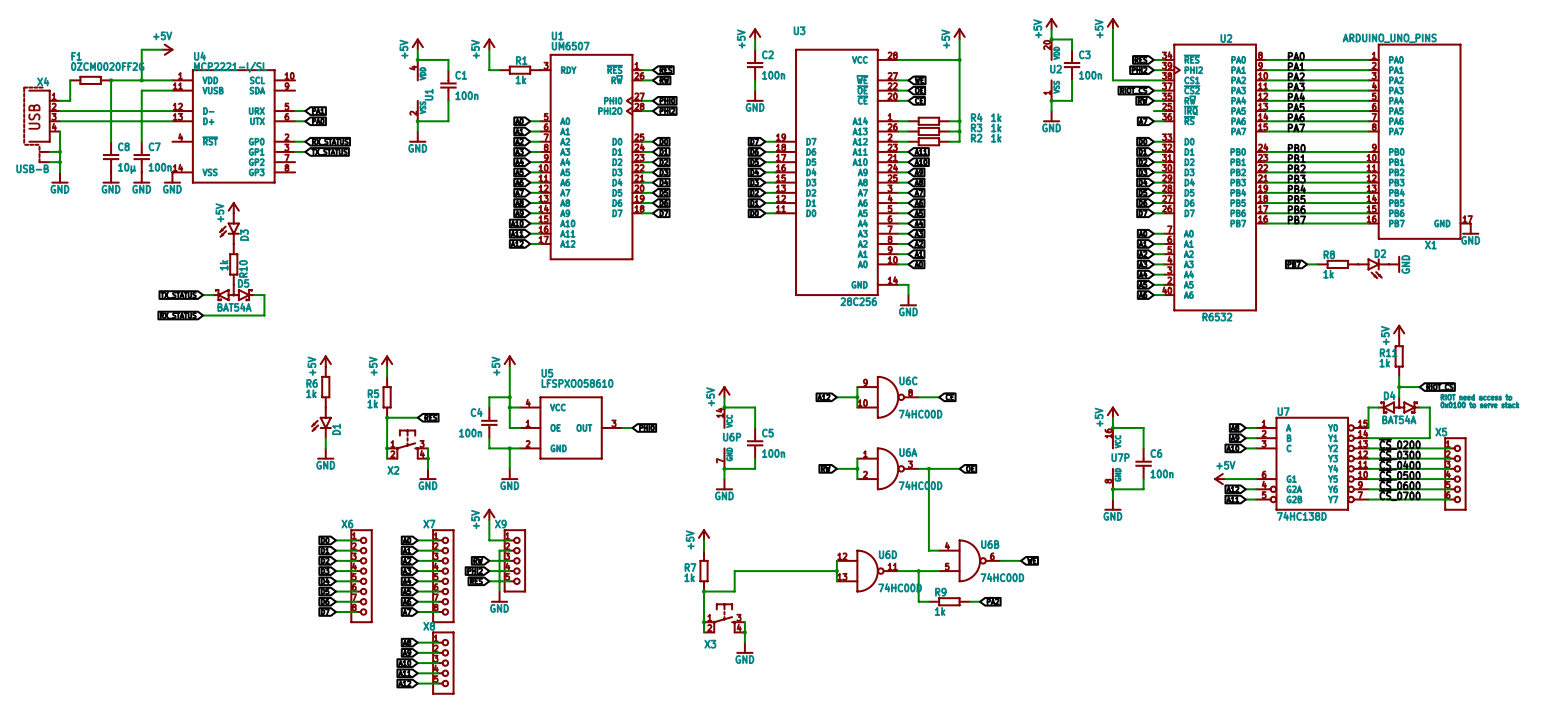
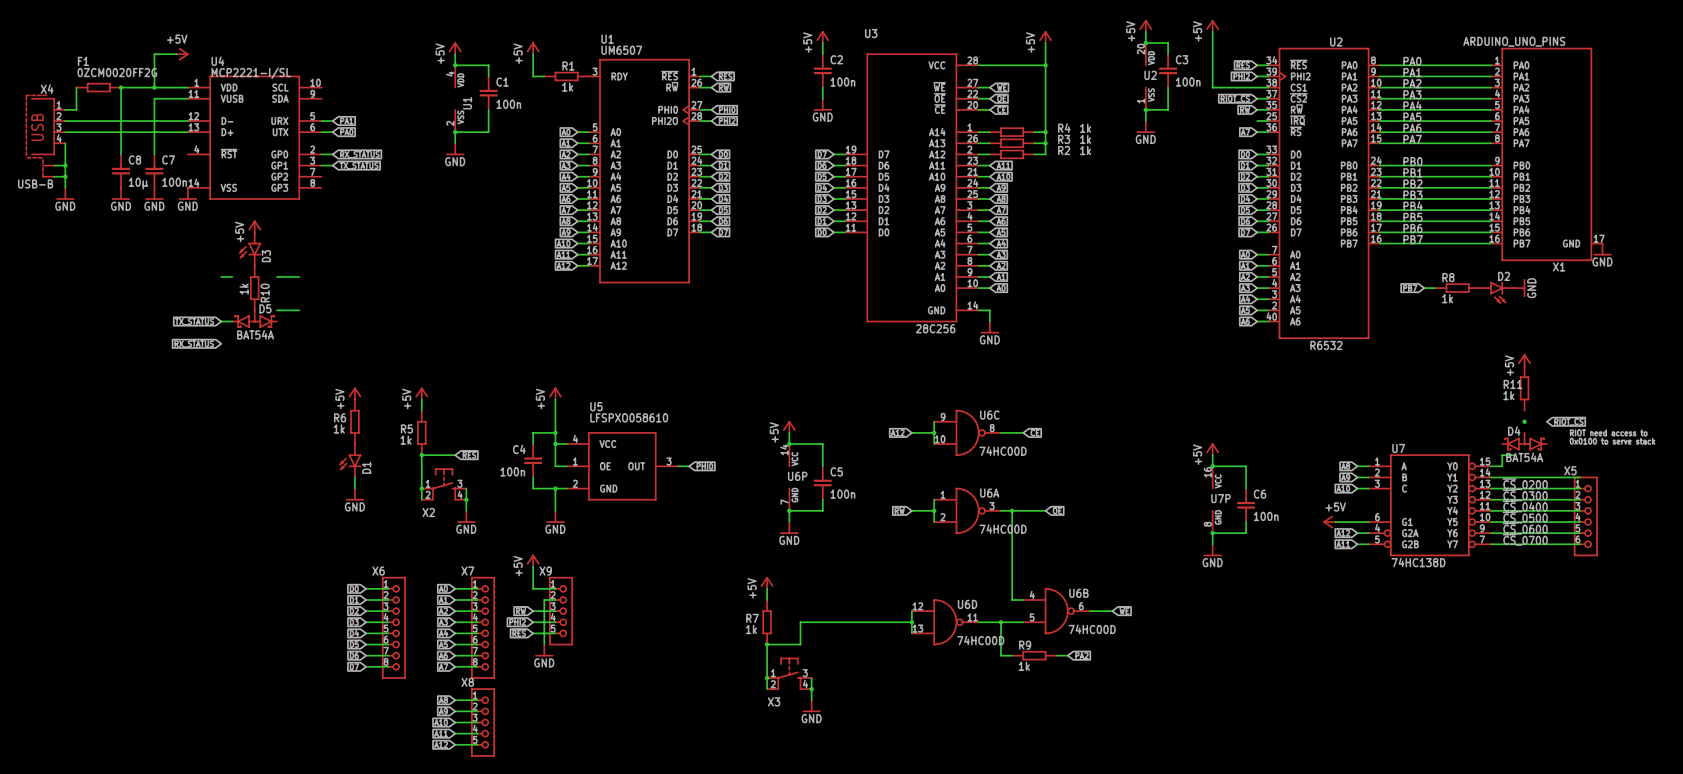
wire: none -> (221, 276) (232, 276)
wire: none -> (276, 276) (299, 276)
wire: none -> (276, 310) (299, 310)
wire: (254, 295) (264, 295) (264, 315) (203, 315) -> none
wire: (1399, 376) (1399, 397) -> none
wire: (1399, 387) (1419, 387) -> none
wire: (1378, 407) (1368, 407) (1368, 427) -> (1513, 455) (1502, 455) (1502, 466) (1491, 466)
wire: (1419, 407) (1429, 407) (1429, 438) -> (1580, 477) (1557, 477)

